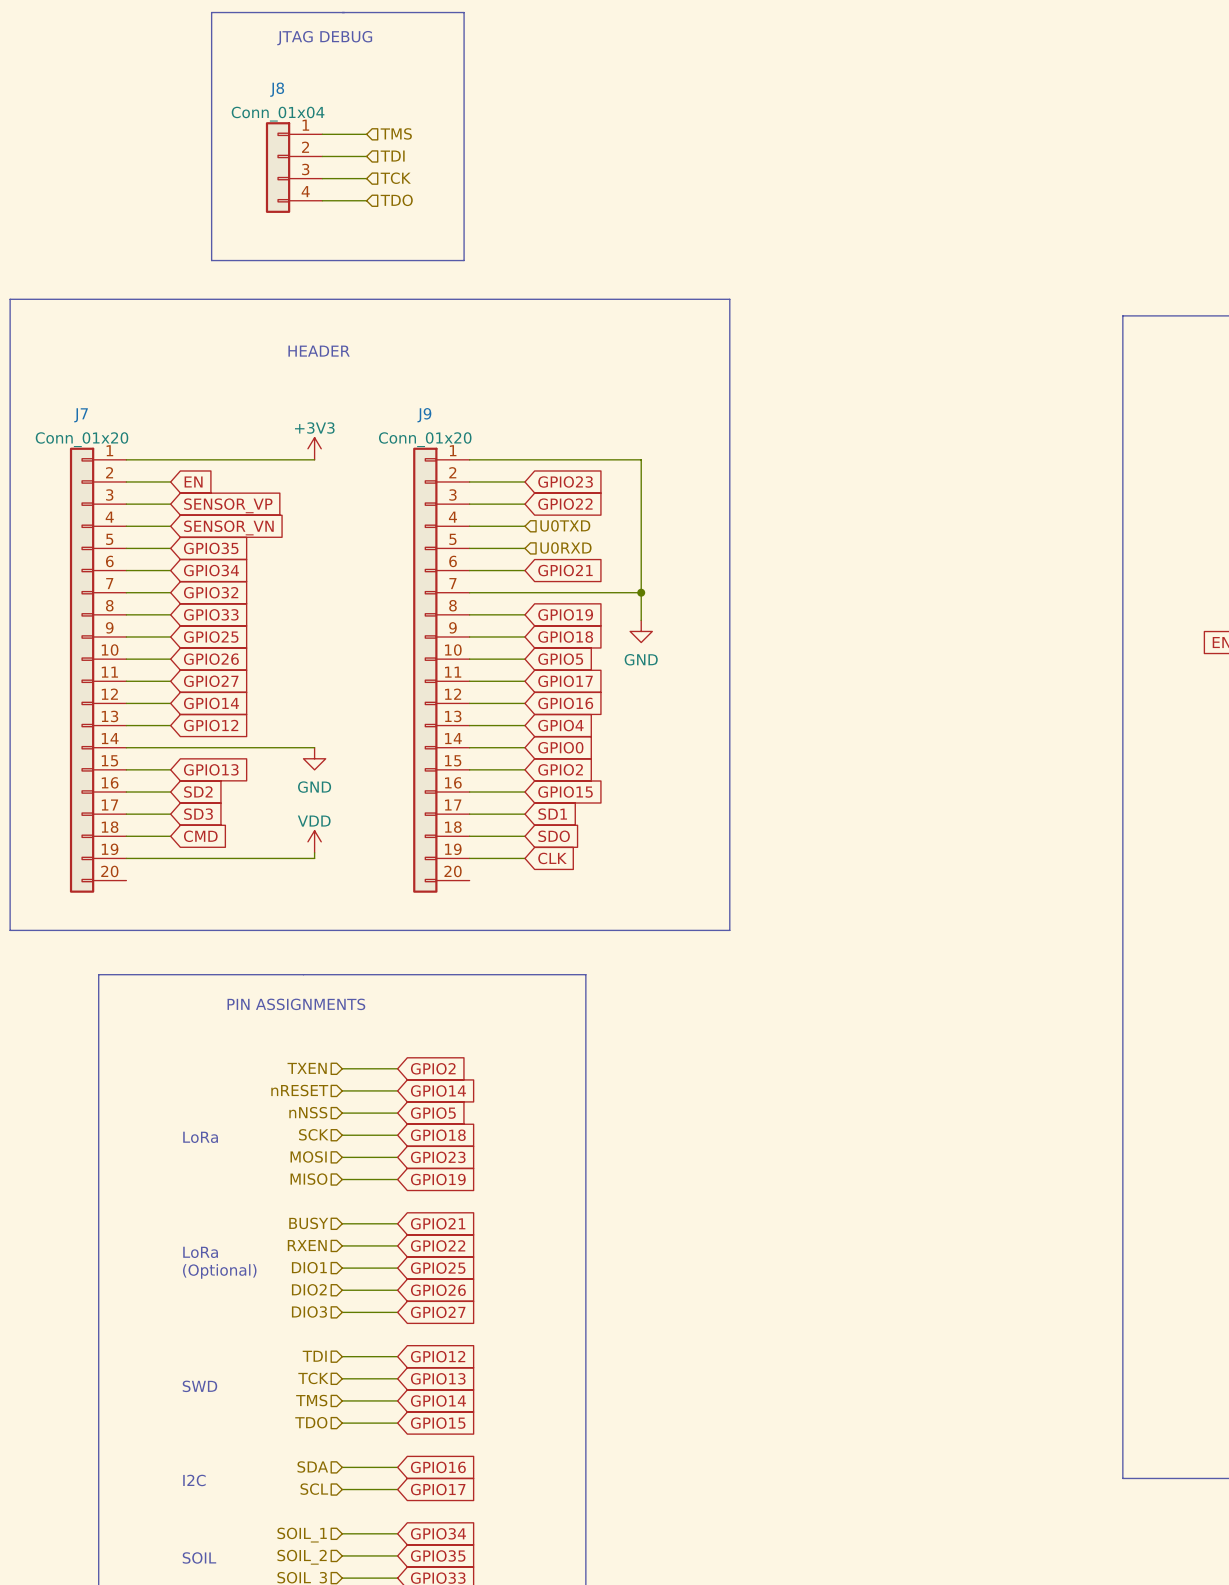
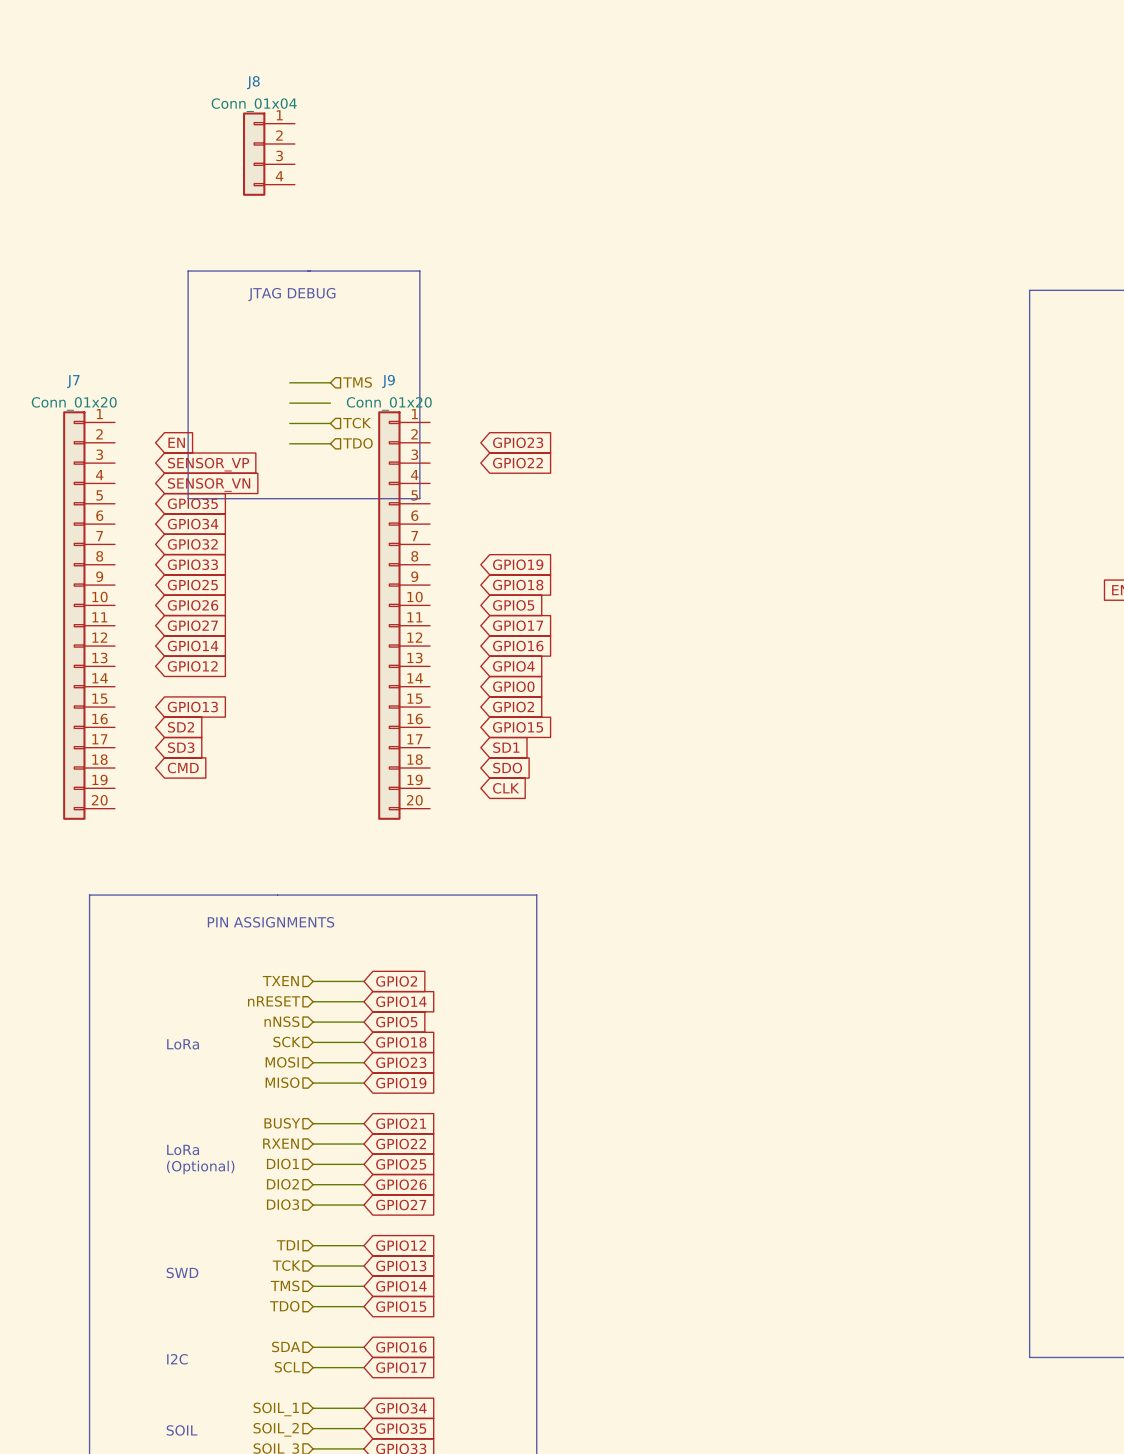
line: (211, 12) (464, 12) (464, 260) (211, 260) (211, 12) -> none
text: JTAG DEBUG (324, 38) -> none
hierarchical label: TMS (396, 133) -> none
wire: (322, 134) (366, 134) -> none
wire: (322, 156) (366, 156) -> none
hierarchical label: TDI (392, 156) -> none
wire: (322, 178) (366, 178) -> none
hierarchical label: TCK (395, 178) -> none
wire: (322, 200) (366, 200) -> none
hierarchical label: TDO (396, 200) -> none
line: none -> (188, 271) (419, 271) (419, 498) (188, 498) (188, 271)
line: (10, 299) (10, 930) (729, 930) (729, 299) (10, 299) -> none
text: none -> JTAG DEBUG (291, 294)
text: HEADER (319, 351) -> none
hierarchical label: none -> TMS (357, 382)
power symbol: +3V3 (314, 448) -> none
wire: (126, 459) (314, 459) -> none
wire: (469, 459) (641, 459) (641, 620) -> none
hierarchical label: none -> TCK (357, 423)
wire: (126, 481) (170, 481) -> (289, 382) (330, 382)
wire: (469, 481) (524, 481) -> none
hierarchical label: none -> TDO (358, 443)
wire: (126, 504) (170, 504) -> (289, 403) (330, 403)
wire: (469, 504) (524, 504) -> none
hierarchical label: U0TXD (565, 525) -> none
wire: (126, 526) (170, 526) -> (289, 423) (330, 423)
wire: (469, 526) (524, 526) -> none
wire: (126, 548) (170, 548) -> (289, 443) (330, 443)
wire: (469, 548) (524, 548) -> none
hierarchical label: U0RXD (565, 548) -> none
wire: (126, 570) (170, 570) -> none
wire: (469, 570) (524, 570) -> none
global label: GPIO21 (565, 570) -> none
wire: (126, 592) (170, 592) -> none
wire: (469, 592) (641, 592) -> none
junction: (641, 592) -> none
wire: (126, 614) (170, 614) -> none
wire: (469, 614) (524, 614) -> none
power symbol: GND (641, 631) -> none
wire: (126, 636) (170, 636) -> none
wire: (469, 636) (524, 636) -> none
wire: (126, 659) (170, 659) -> none
wire: (469, 659) (524, 659) -> none
wire: (126, 681) (170, 681) -> none
wire: (469, 681) (524, 681) -> none
wire: (126, 703) (170, 703) -> none
wire: (469, 703) (524, 703) -> none
wire: (126, 725) (170, 725) -> none
wire: (469, 725) (524, 725) -> none
wire: (126, 747) (314, 747) -> none
wire: (469, 747) (524, 747) -> none
power symbol: GND (314, 758) -> none
wire: (126, 769) (170, 769) -> none
wire: (469, 769) (524, 769) -> none
wire: (126, 792) (170, 792) -> none
wire: (469, 792) (524, 792) -> none
wire: (126, 814) (170, 814) -> none
wire: (469, 814) (524, 814) -> none
wire: (126, 836) (170, 836) -> none
wire: (469, 836) (524, 836) -> none
power symbol: VDD (314, 841) -> none
wire: (314, 852) (314, 858) (126, 858) -> none
wire: (469, 858) (524, 858) -> none

